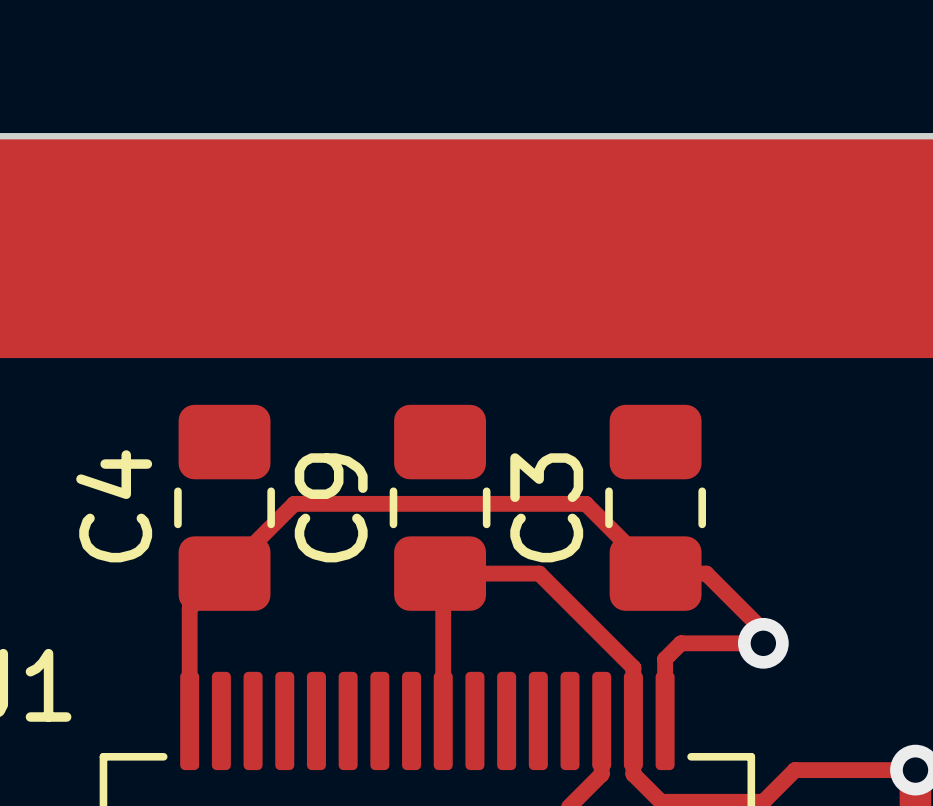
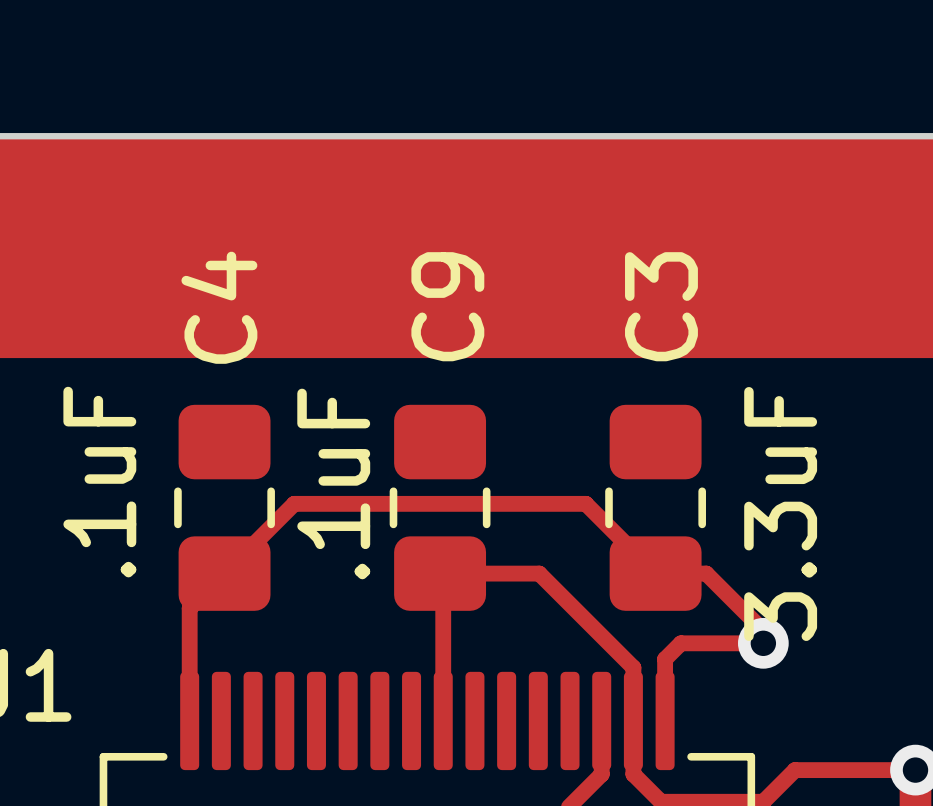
C4 value: none -> .1uF (99, 482)
C9 value: none -> .1uF (333, 483)
C4 name position: C4 (114, 506) -> C4 (219, 307)
C9 name position: C9 (331, 507) -> C9 (447, 306)
C3 name position: C3 (546, 507) -> C3 (661, 306)
C3 value: none -> 3.3uF (780, 514)

